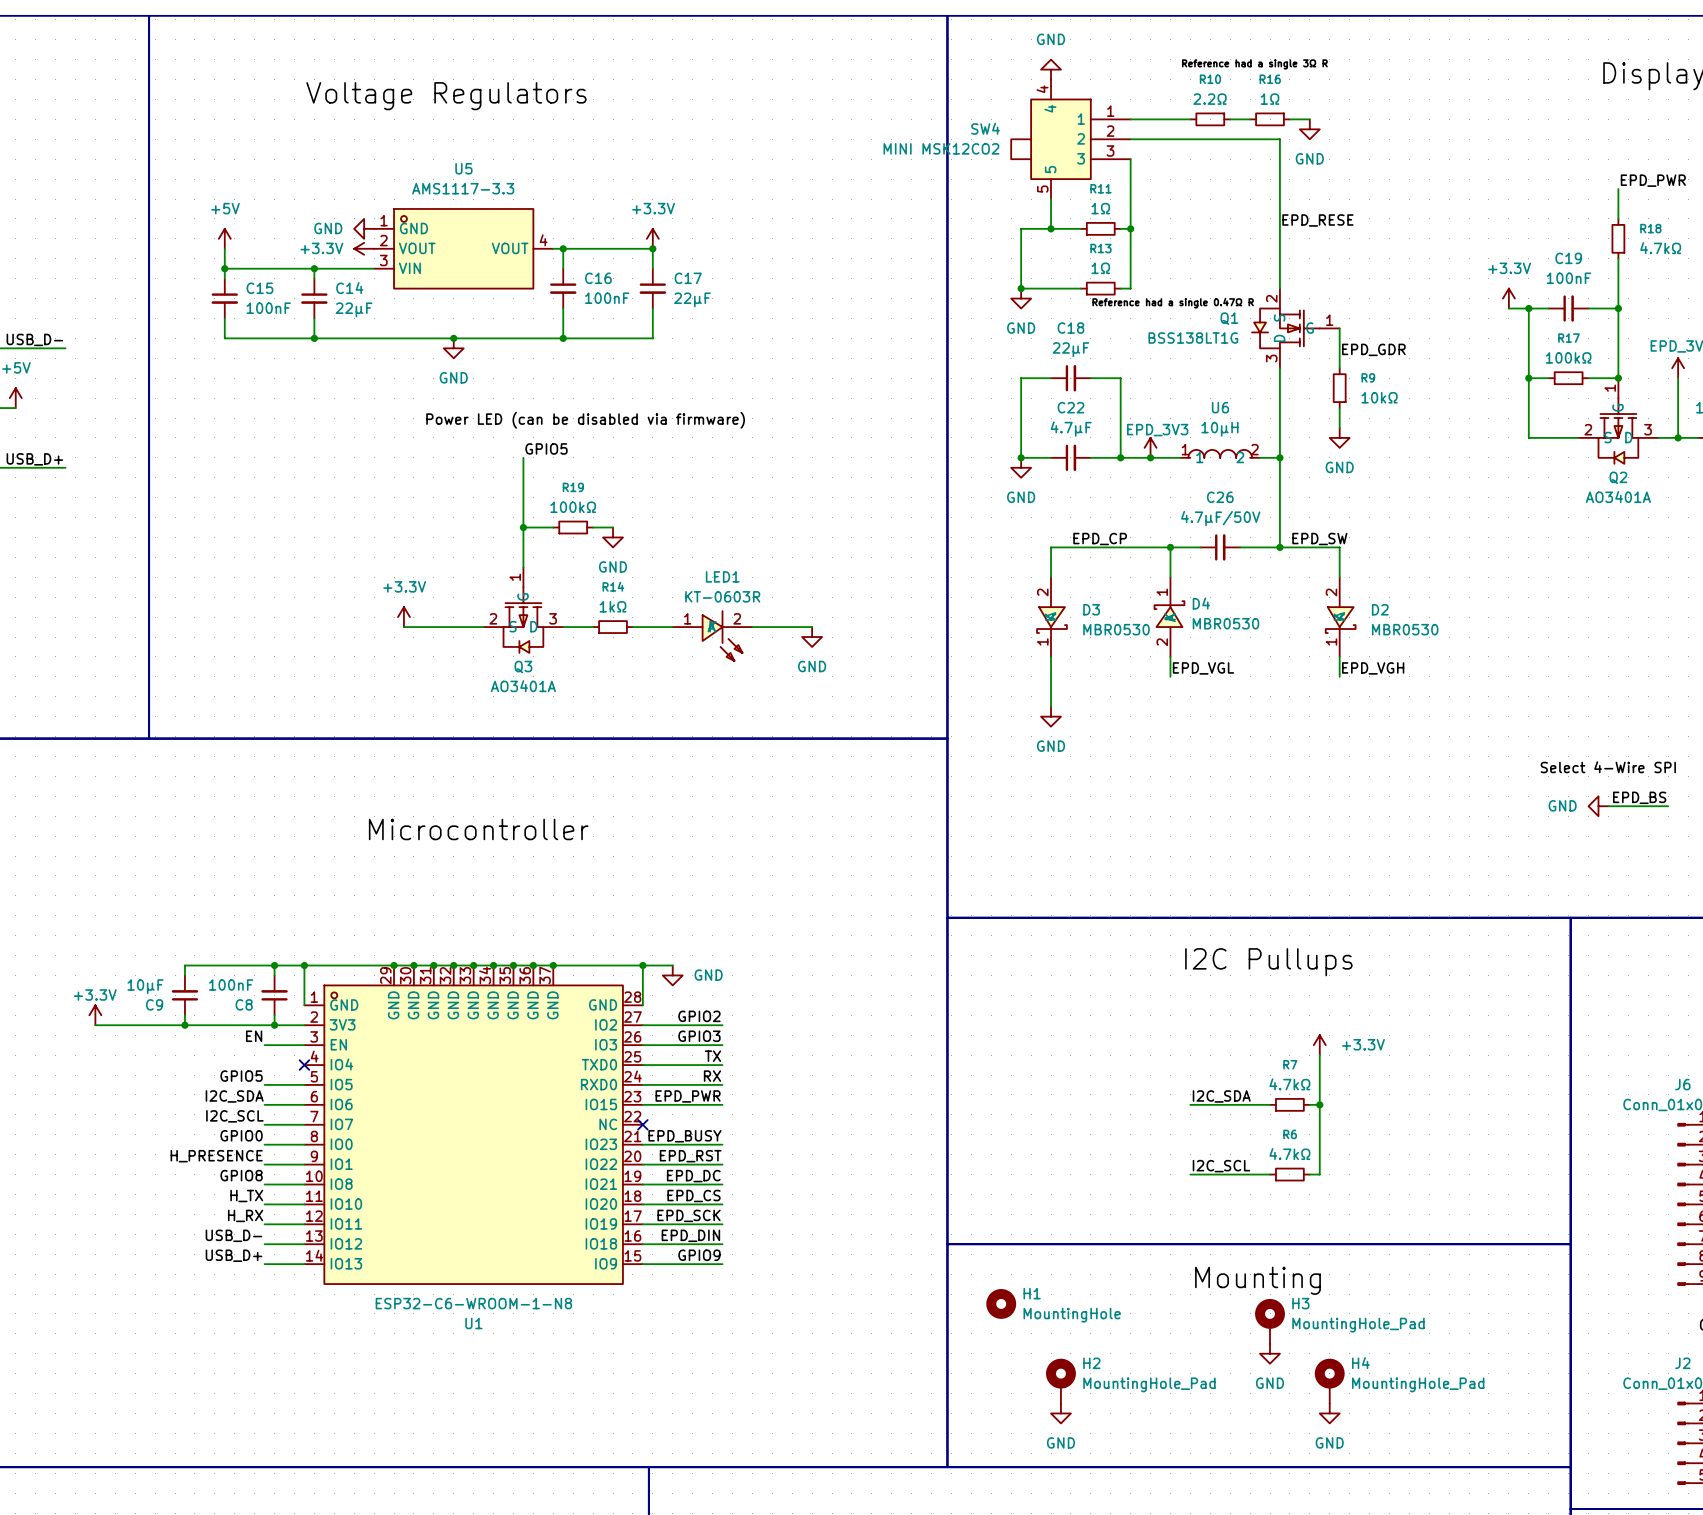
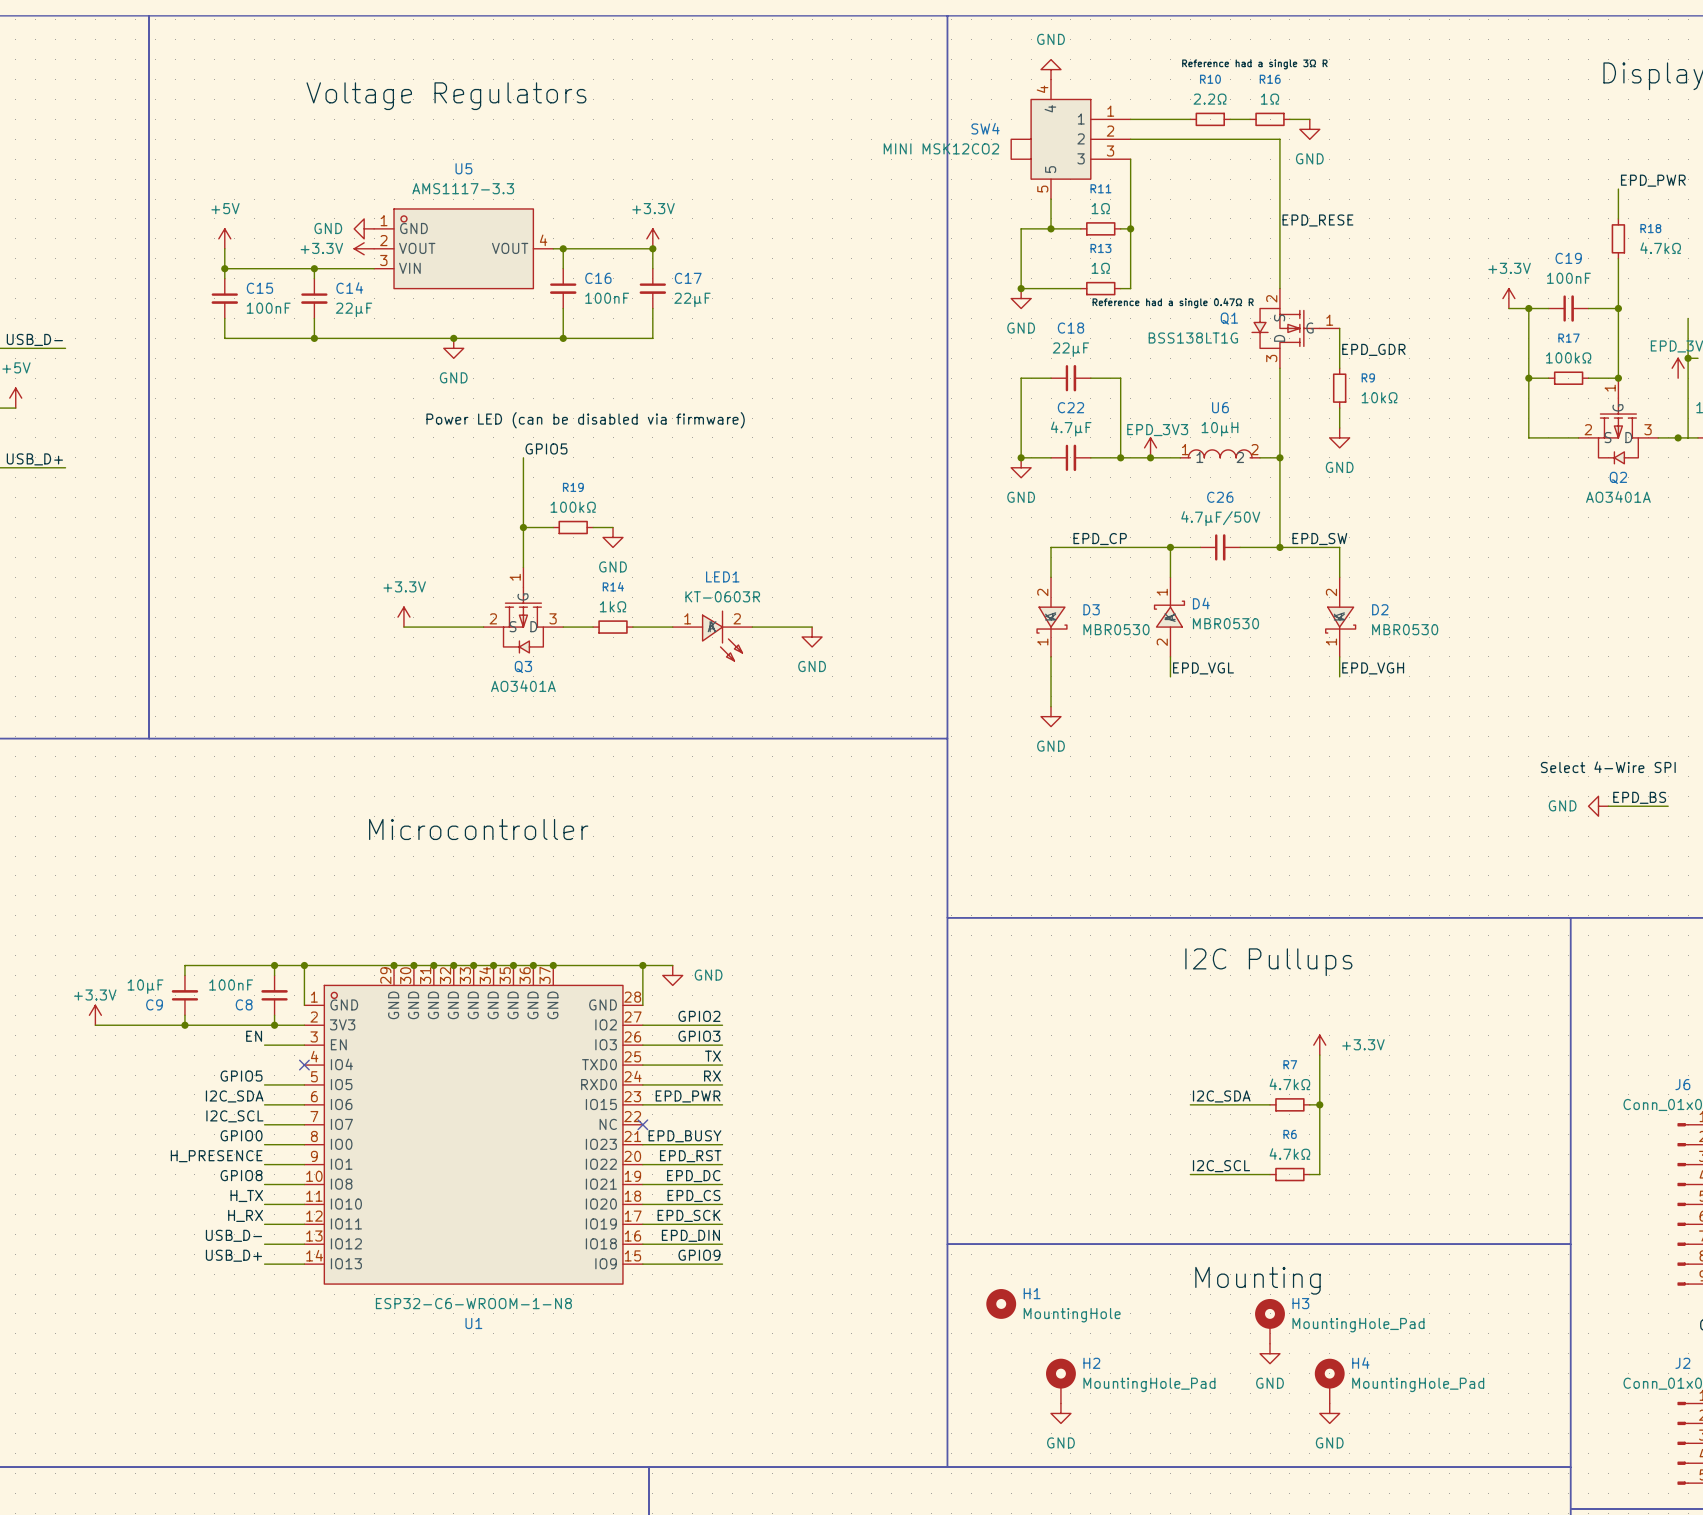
wire: none -> (1688, 318) (1688, 437)
wire: none -> (1688, 358) (1698, 358)
junction: none -> (1688, 358)
wire: (1678, 378) (1678, 437) -> none

